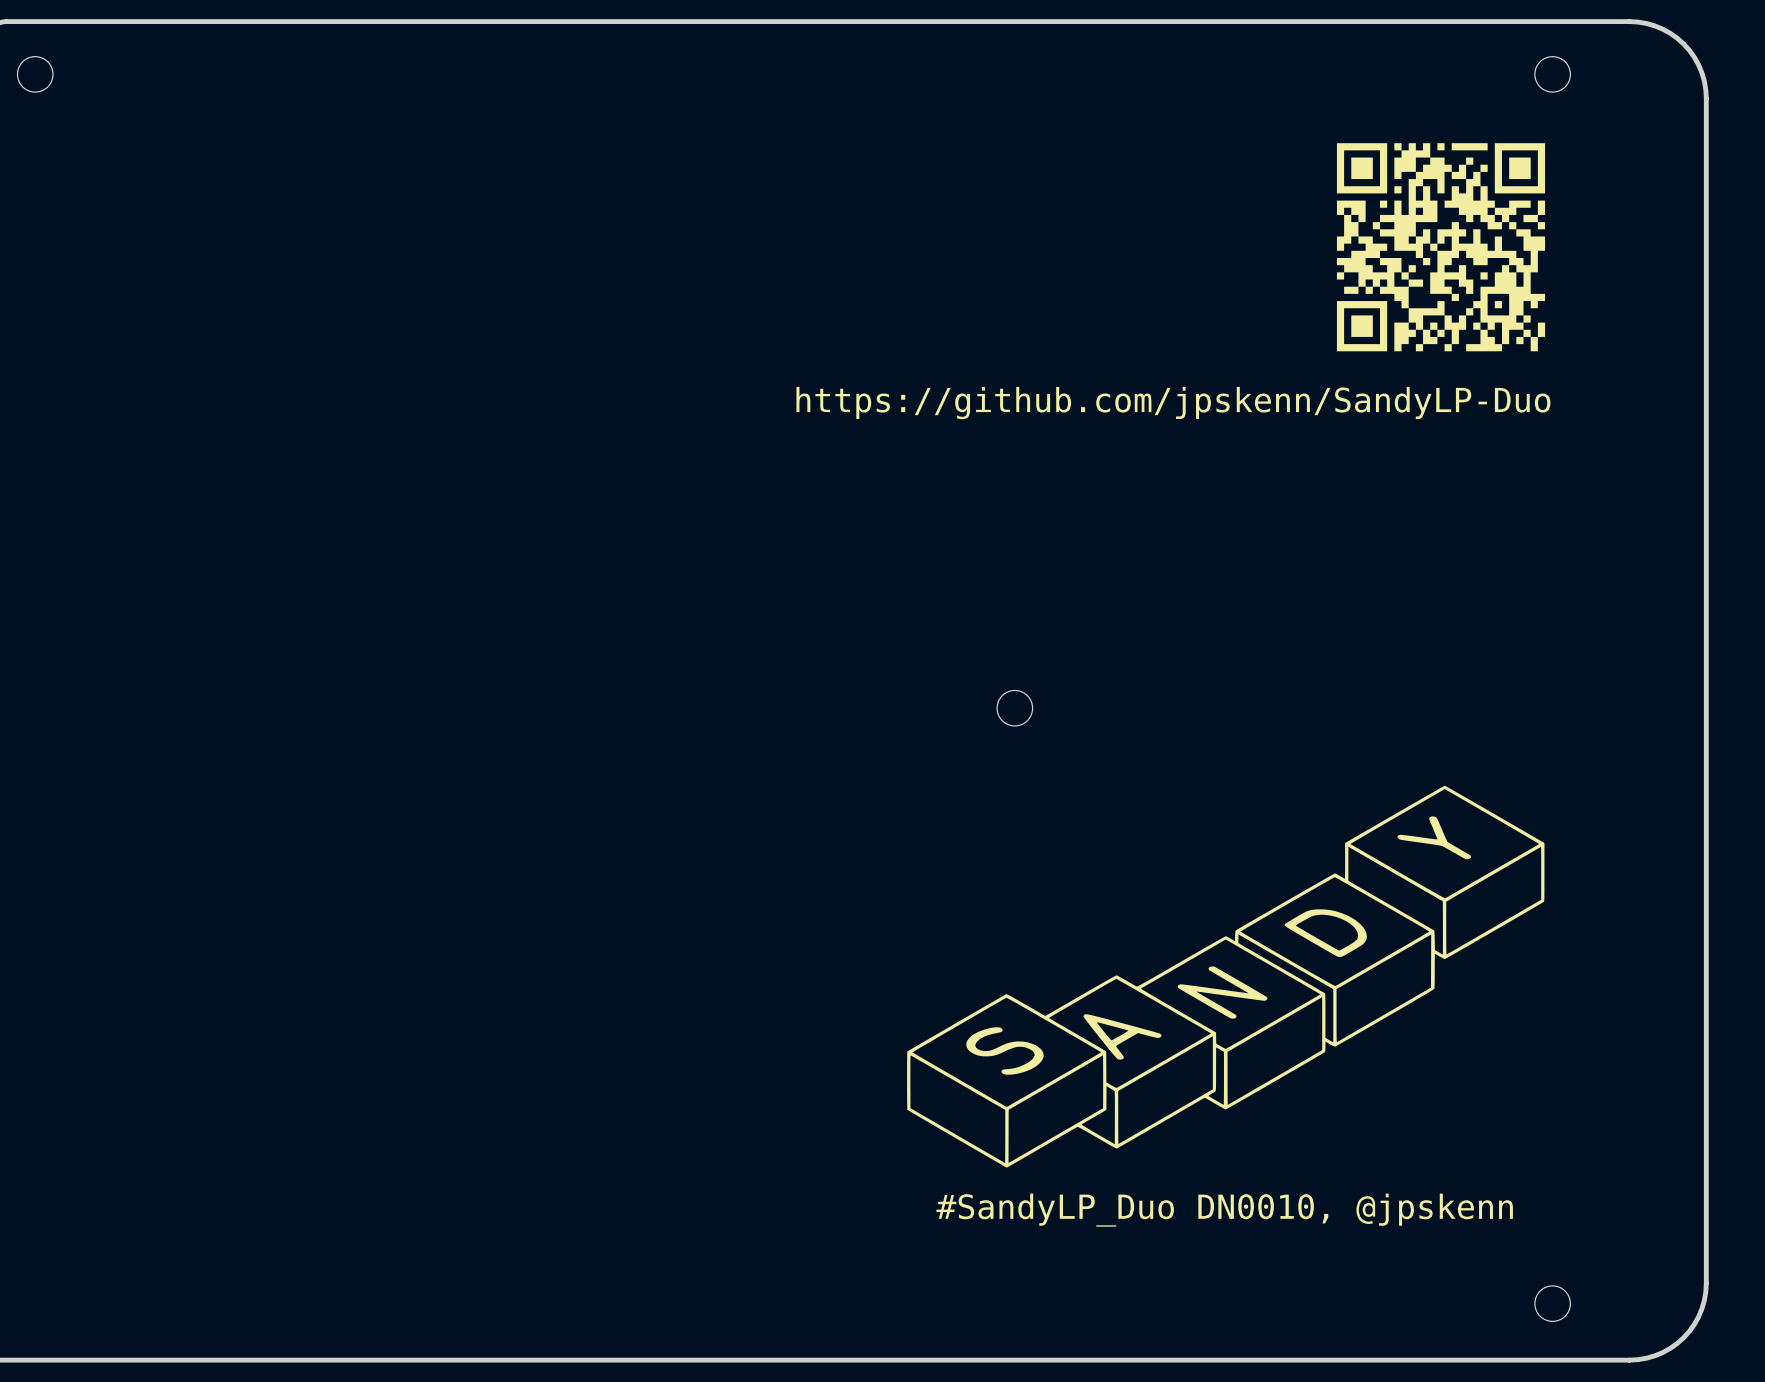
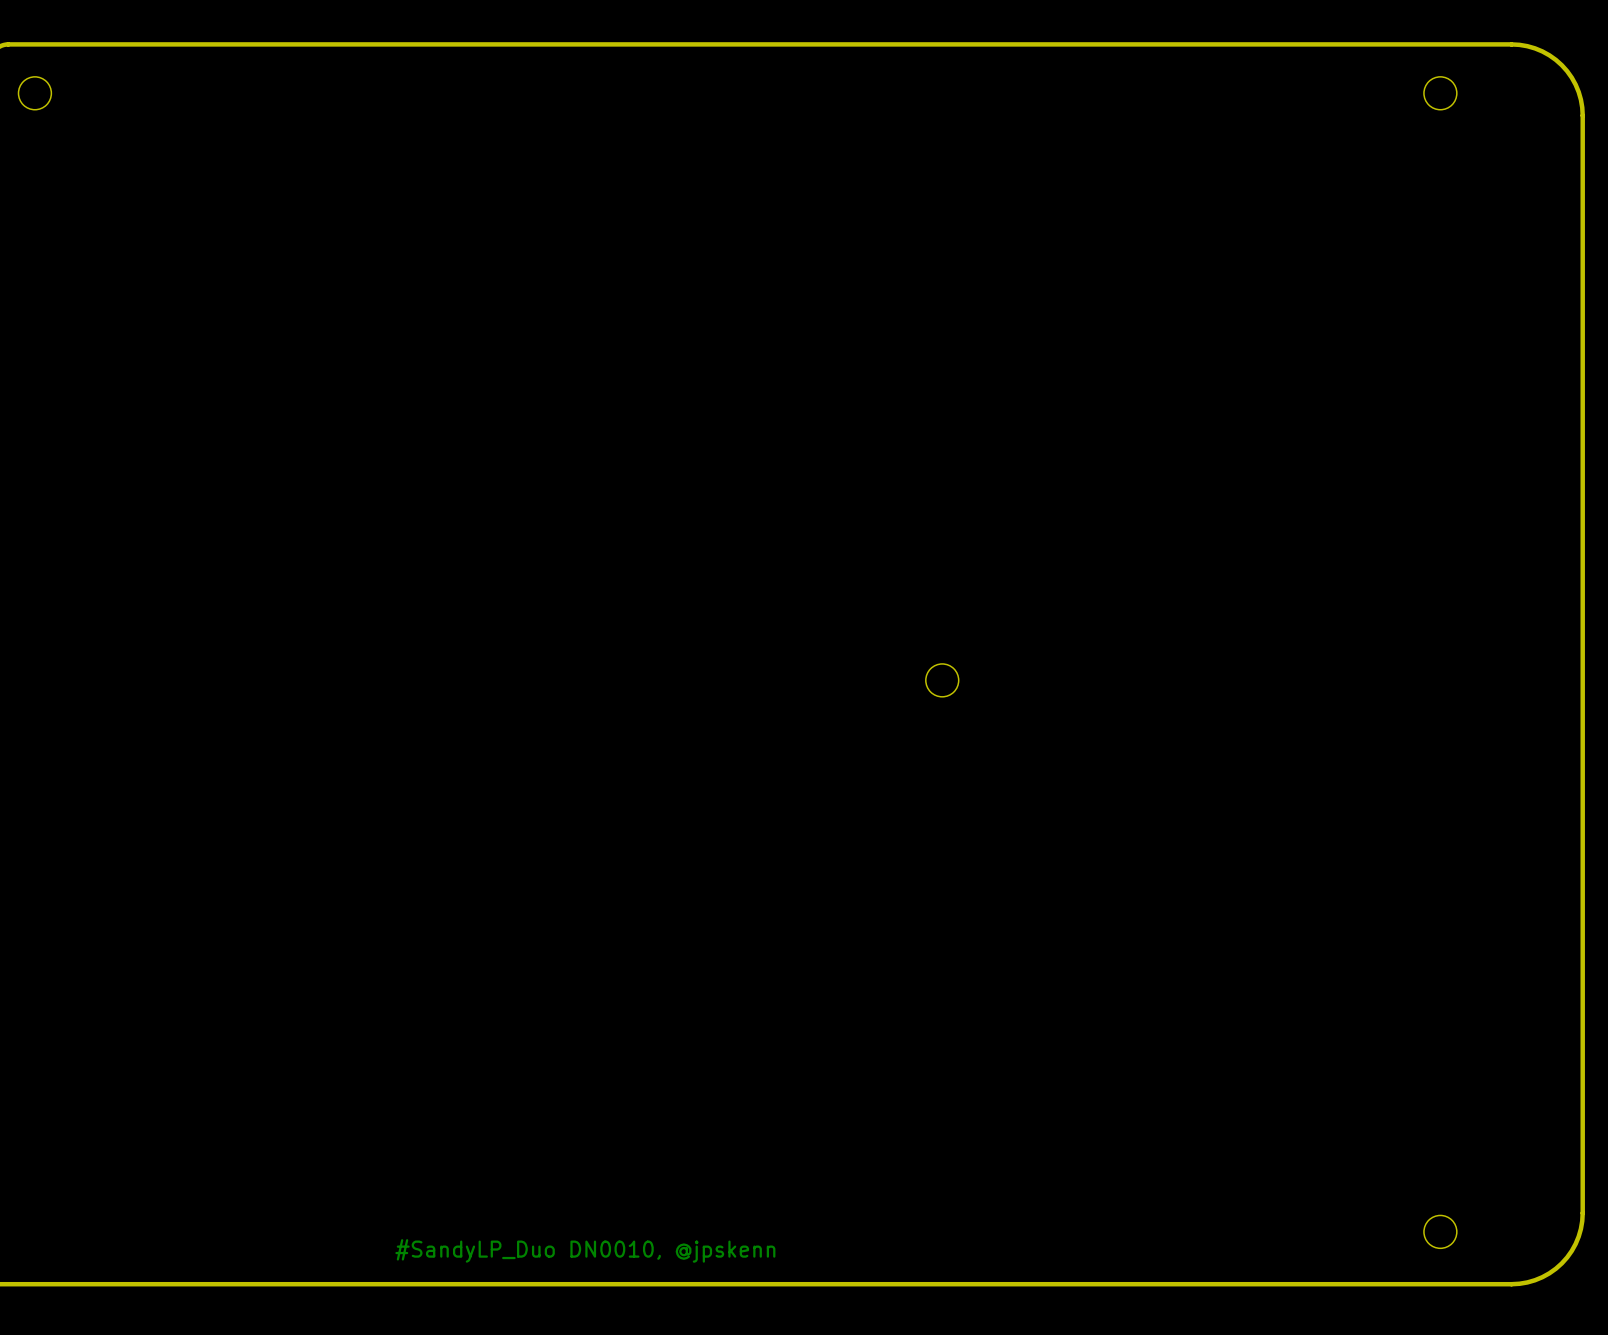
drawing: [1336, 143, 1546, 352] -> none
text: https://github.com/jpskenn/SandyLP-Duo (1173, 403) -> none
drawing: [907, 785, 1545, 1168] -> none
text: #SandyLP_Duo DN0010, @jpskenn (1224, 1210) -> none
text: none -> #SandyLP_Duo DN0010, @jpskenn (585, 1250)

